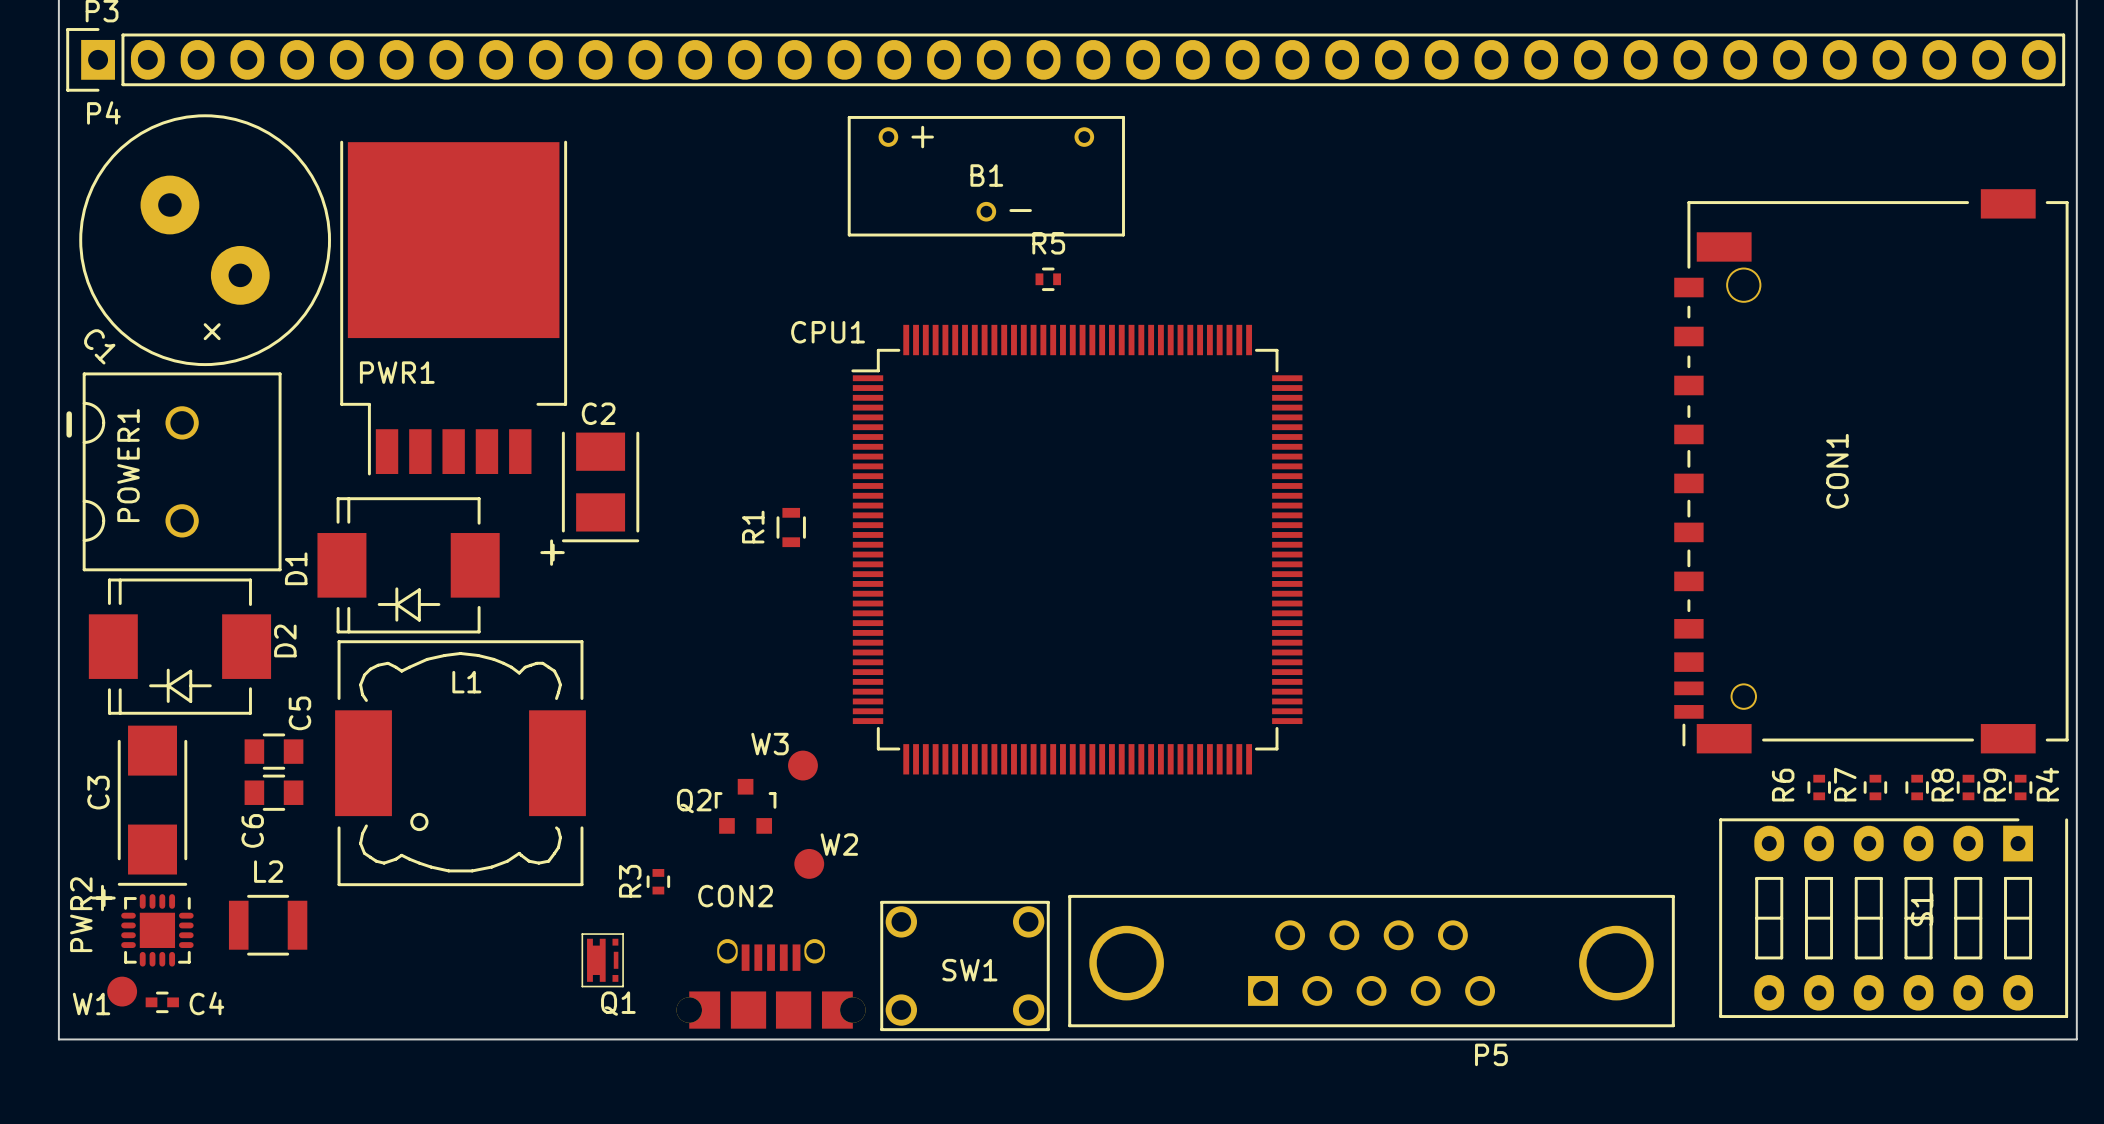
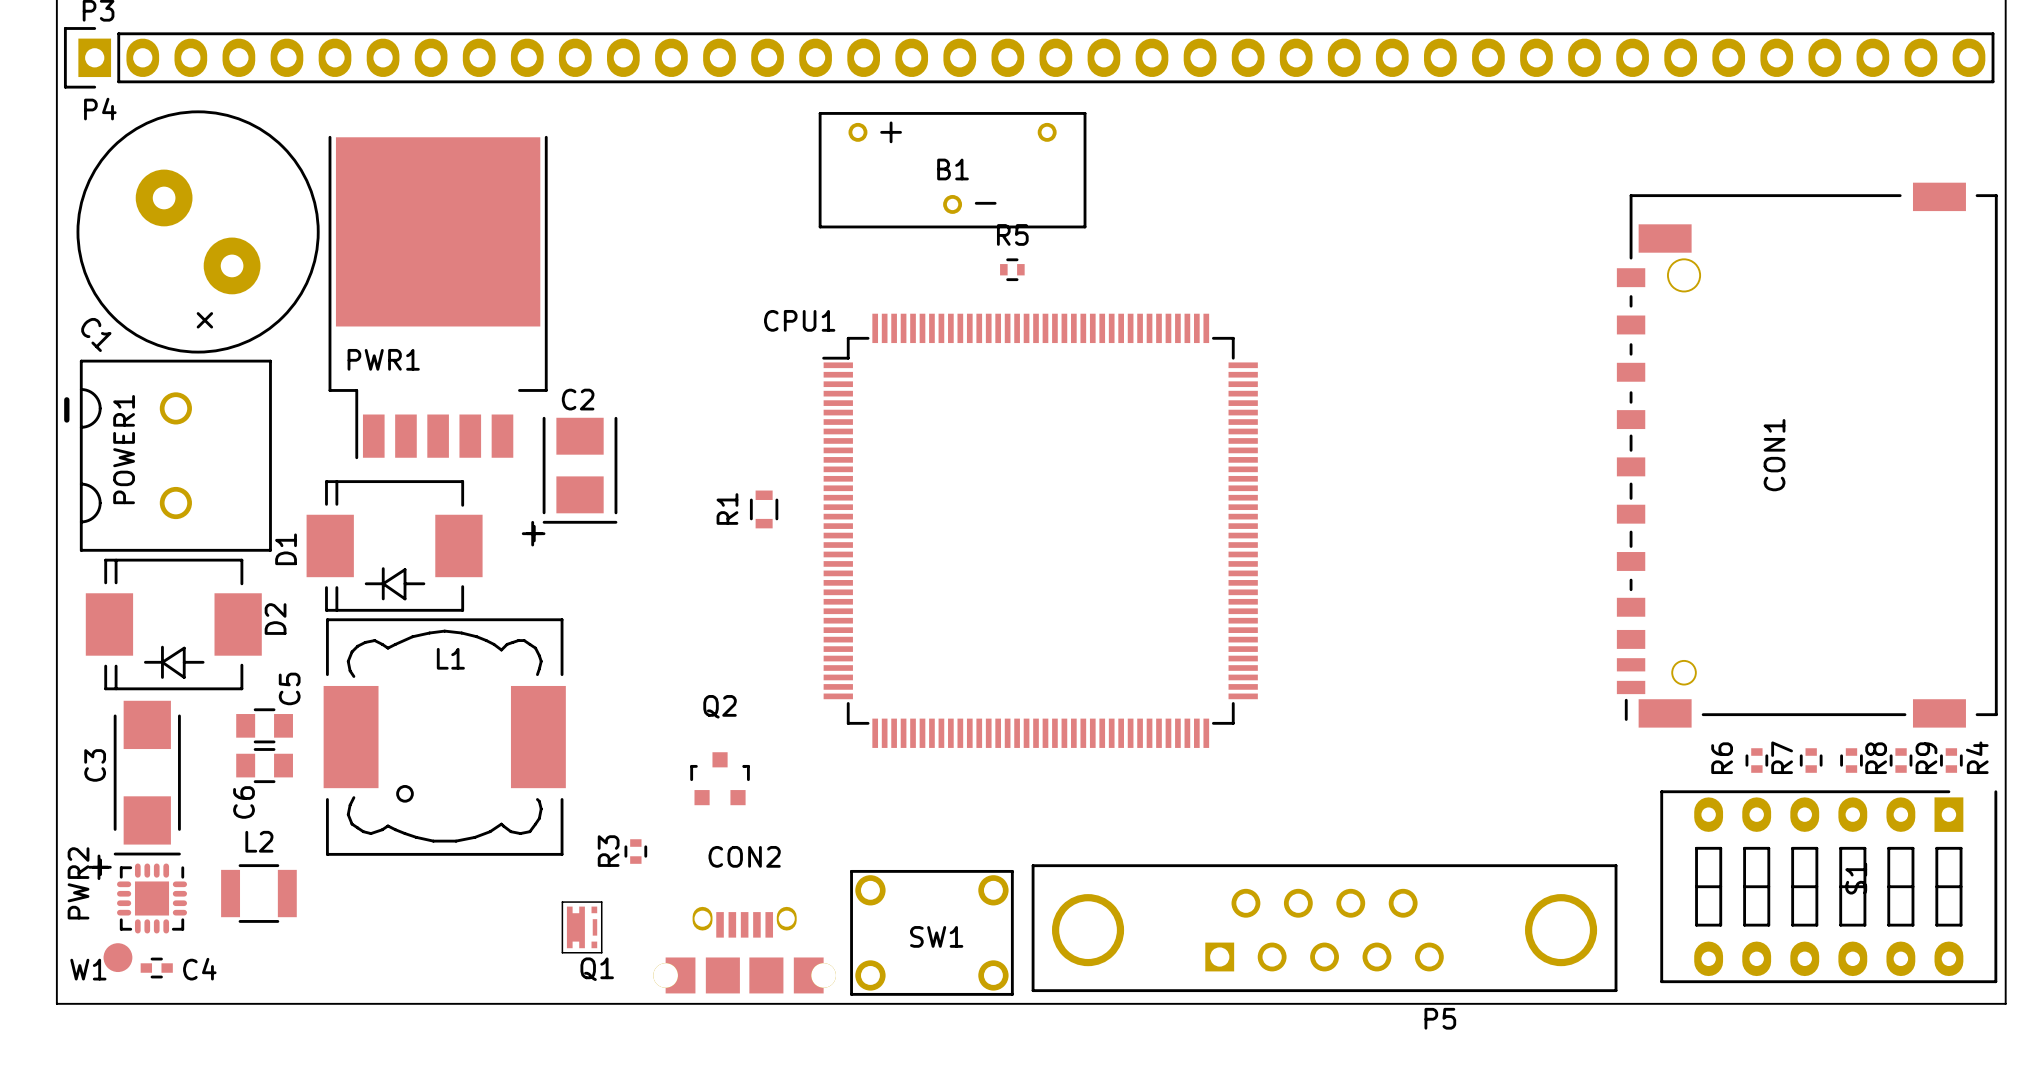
W3: (802, 765) -> none
Q2 name position: Q2 (694, 801) -> Q2 (720, 706)
W2: (809, 863) -> none
CON2 name position: CON2 (735, 896) -> CON2 (744, 856)

